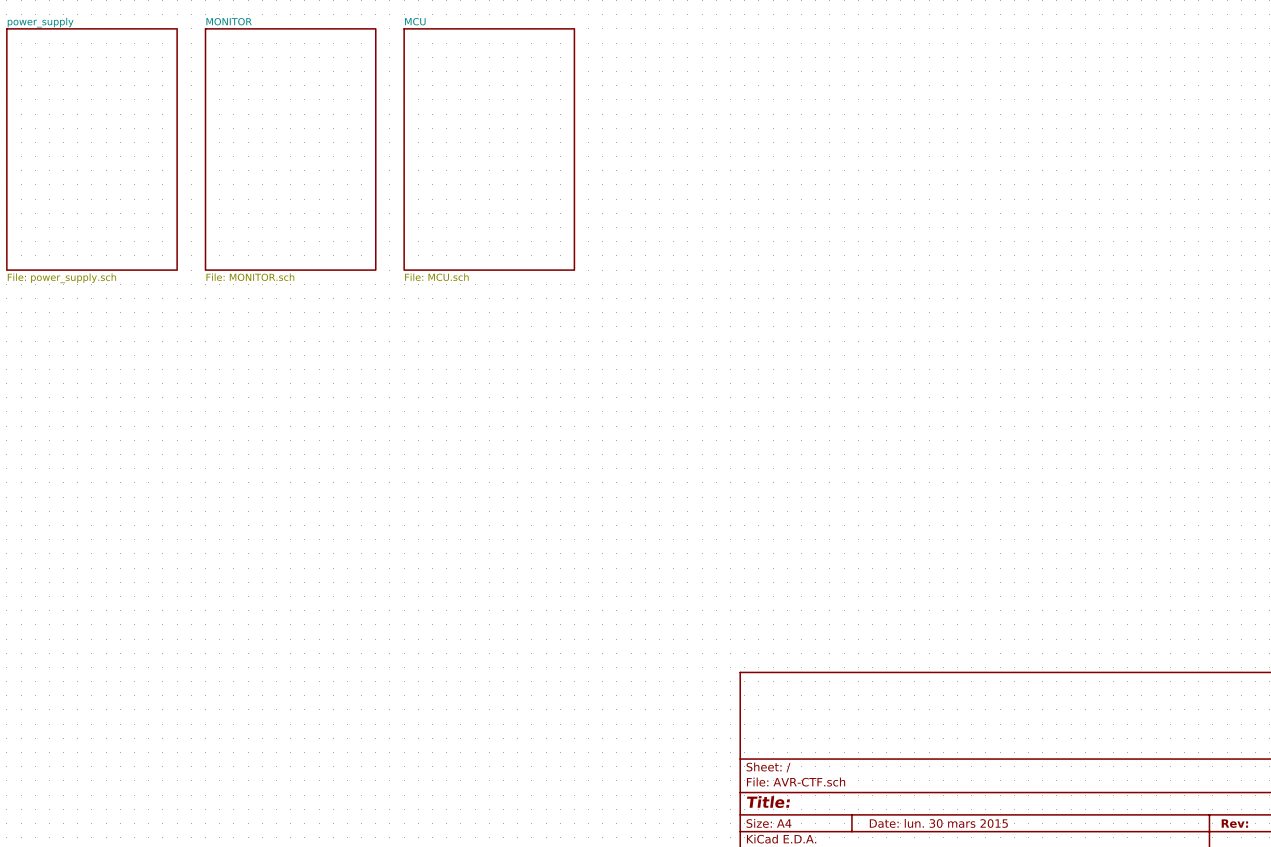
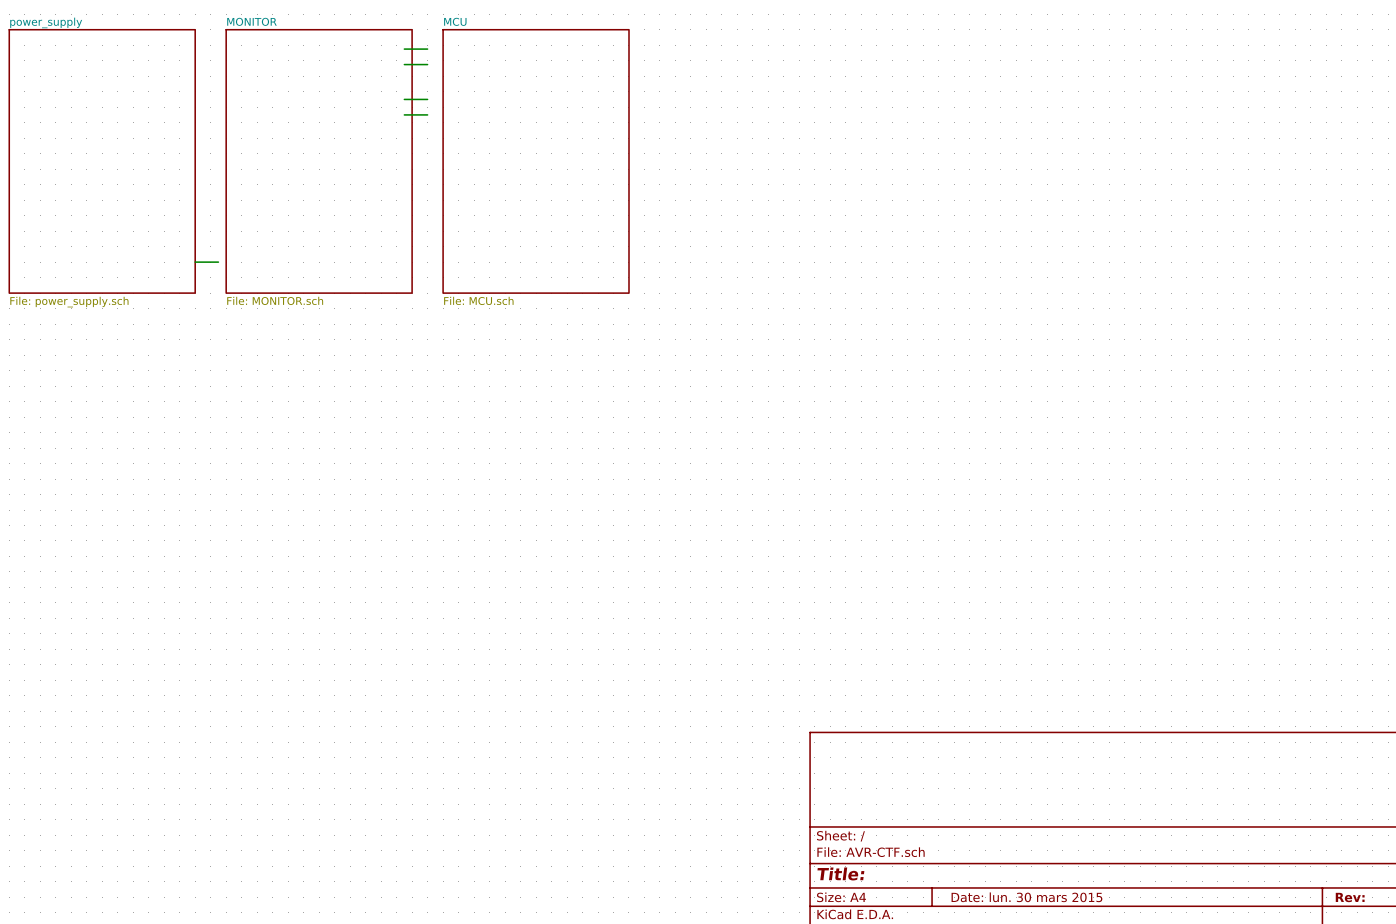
wire: none -> (404, 49) (427, 49)
wire: none -> (404, 64) (427, 64)
wire: none -> (404, 99) (427, 99)
wire: none -> (404, 114) (427, 114)
wire: none -> (195, 262) (218, 262)

